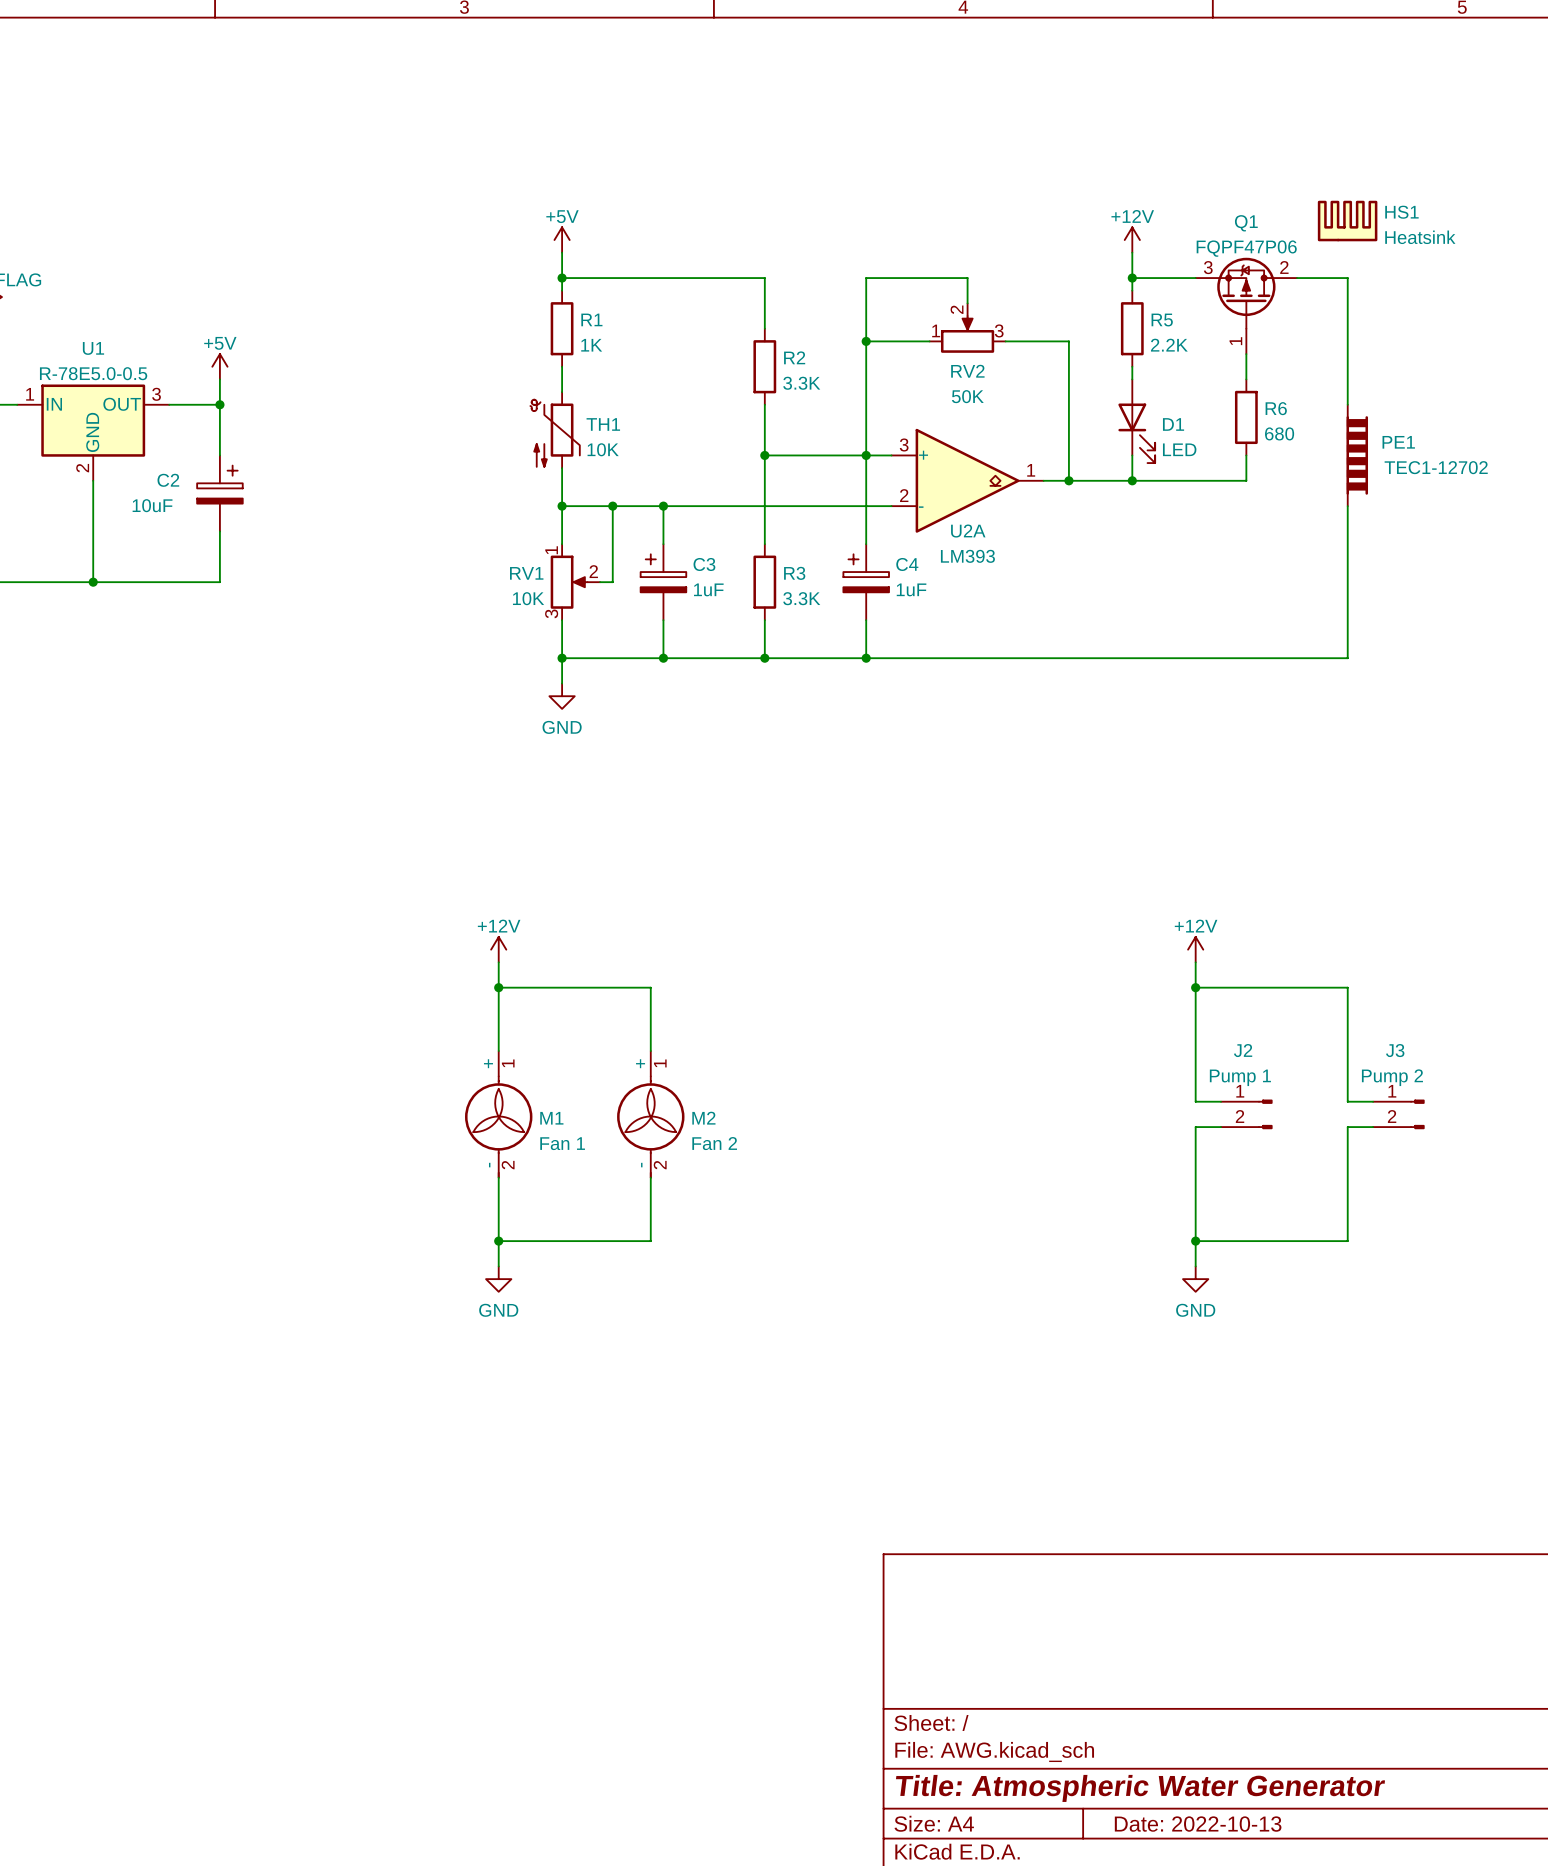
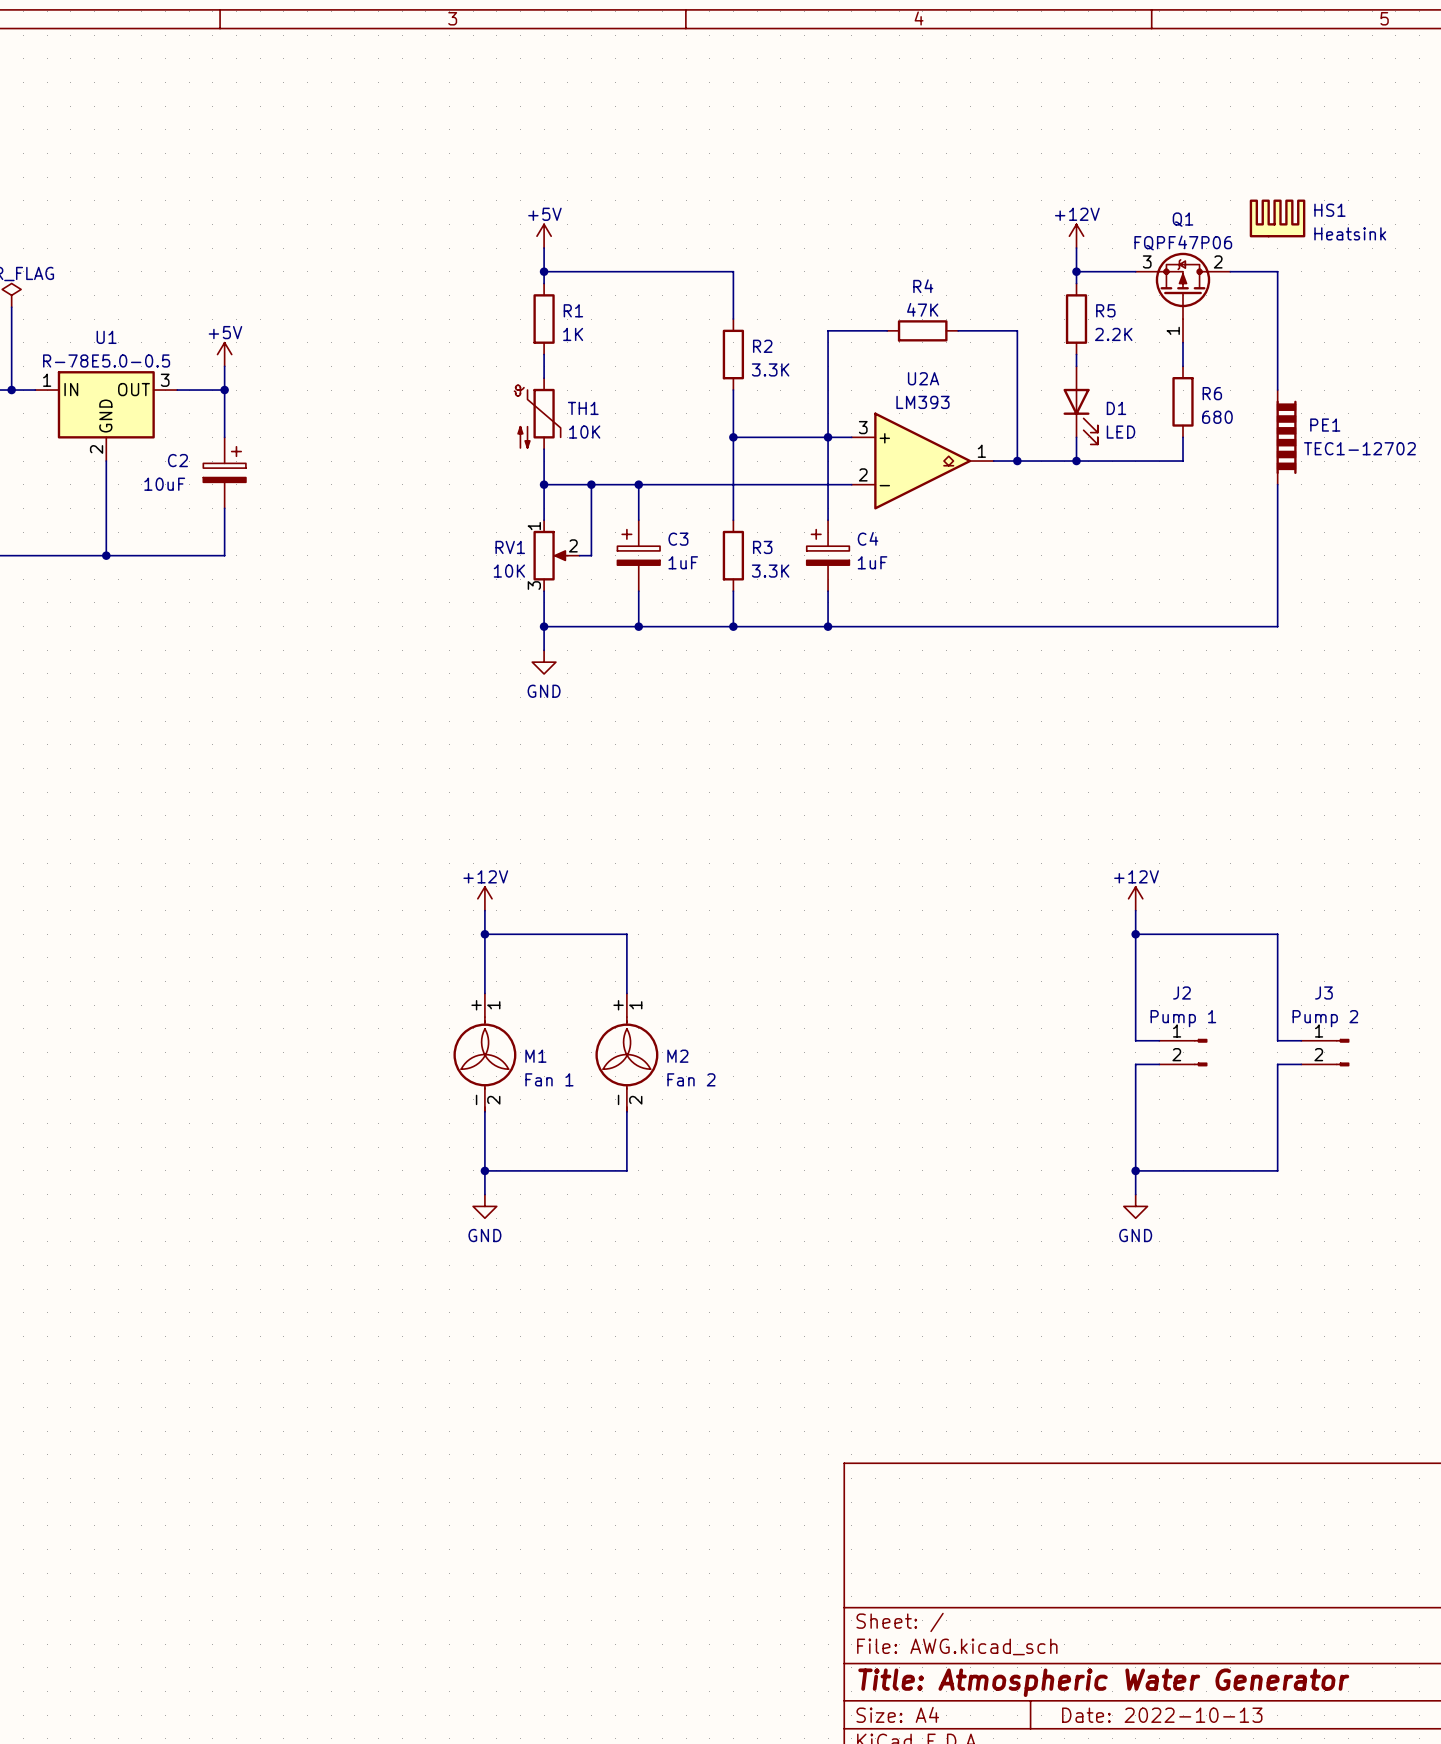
wire: (967, 303) (967, 278) (866, 278) (866, 341) -> none
RV2: 50K (967, 328) -> none
junction: (866, 341) -> none
R4: none -> 47K (922, 330)
U2A name position: U2A (968, 531) -> U2A (923, 378)
U2A value position: LM393 (967, 556) -> LM393 (922, 402)

